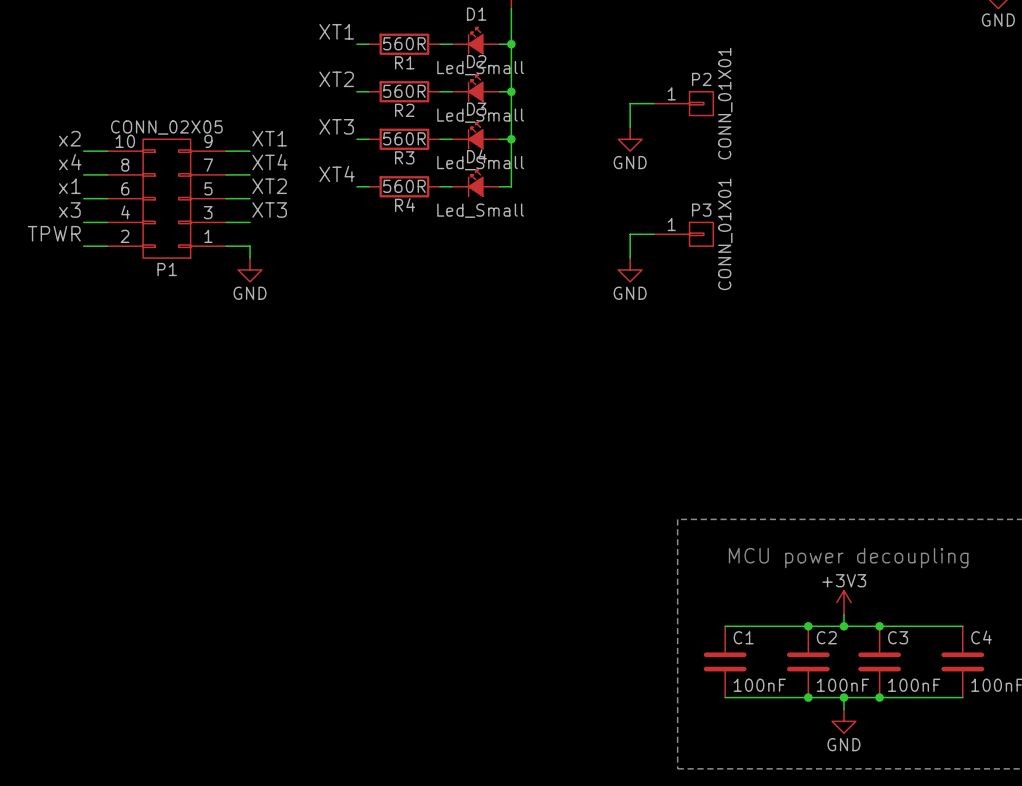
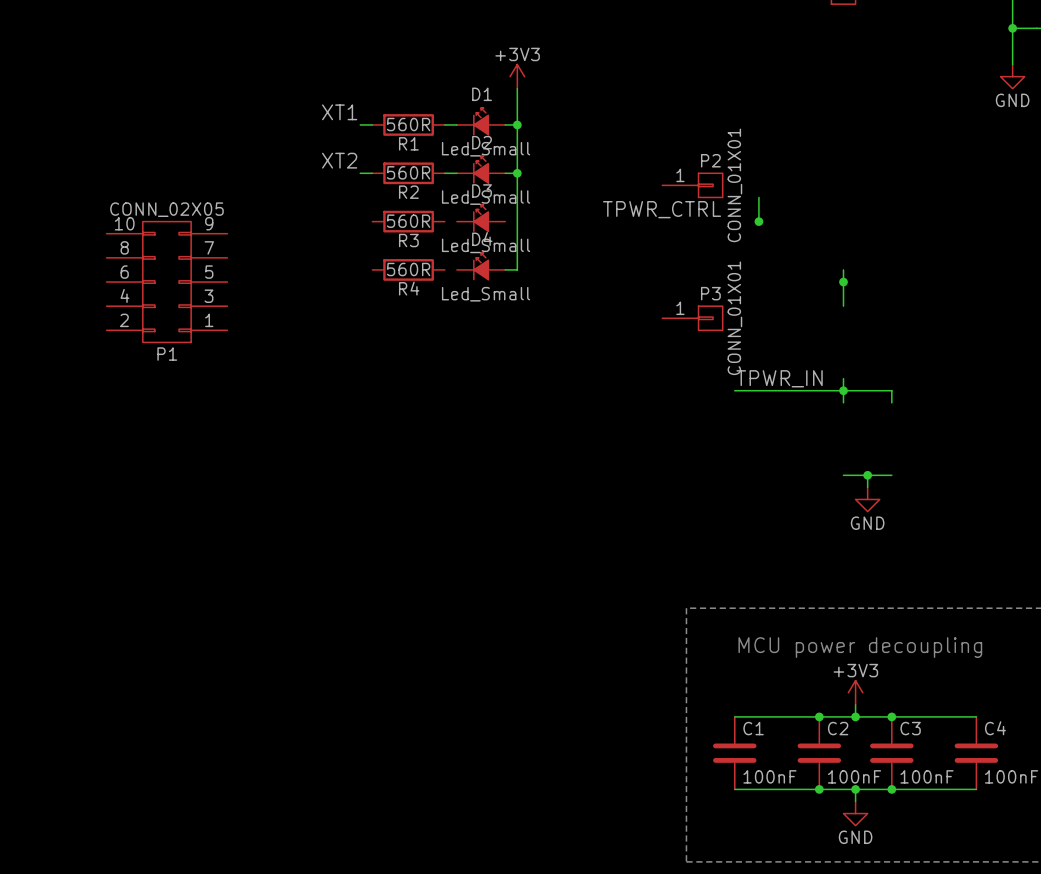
wire: (653, 103) (630, 103) (630, 127) -> none
wire: none -> (758, 197) (758, 221)
label: XT3 (336, 126) -> none
label: none -> TPWR_CTRL (662, 209)
label: x2 (69, 138) -> none
label: XT1 (269, 138) -> none
wire: (356, 139) (368, 139) -> none
wire: (440, 139) (451, 139) -> none
wire: (499, 139) (511, 139) -> none
junction: (511, 139) -> none
power symbol: GND (630, 139) -> none
junction: none -> (758, 221)
wire: (83, 151) (107, 151) -> none
wire: (226, 151) (250, 151) -> none
label: x4 (70, 162) -> none
label: XT4 (269, 162) -> none
wire: (83, 174) (107, 174) -> none
wire: (226, 174) (250, 174) -> none
label: XT4 (336, 174) -> none
label: x1 (69, 186) -> none
label: XT2 (269, 186) -> none
wire: (356, 186) (368, 186) -> none
wire: (440, 186) (451, 186) -> none
wire: none -> (843, 269) (843, 306)
wire: (83, 198) (107, 198) -> none
wire: (226, 198) (250, 198) -> none
junction: none -> (843, 282)
label: x3 (69, 209) -> none
label: XT3 (269, 209) -> none
wire: (83, 222) (107, 222) -> none
wire: (226, 222) (250, 222) -> none
label: TPWR (54, 233) -> none
wire: (653, 234) (630, 234) (630, 258) -> none
wire: (83, 246) (107, 246) -> none
wire: (226, 246) (250, 246) (250, 258) -> none
power symbol: GND (250, 269) -> none
power symbol: GND (630, 269) -> none
label: none -> TPWR_IN (779, 378)
wire: none -> (843, 378) (843, 402)
wire: none -> (734, 390) (891, 390) (891, 402)
junction: none -> (843, 390)
wire: none -> (843, 475) (891, 475)
wire: none -> (867, 475) (867, 487)
junction: none -> (867, 475)
power symbol: none -> GND (867, 499)

